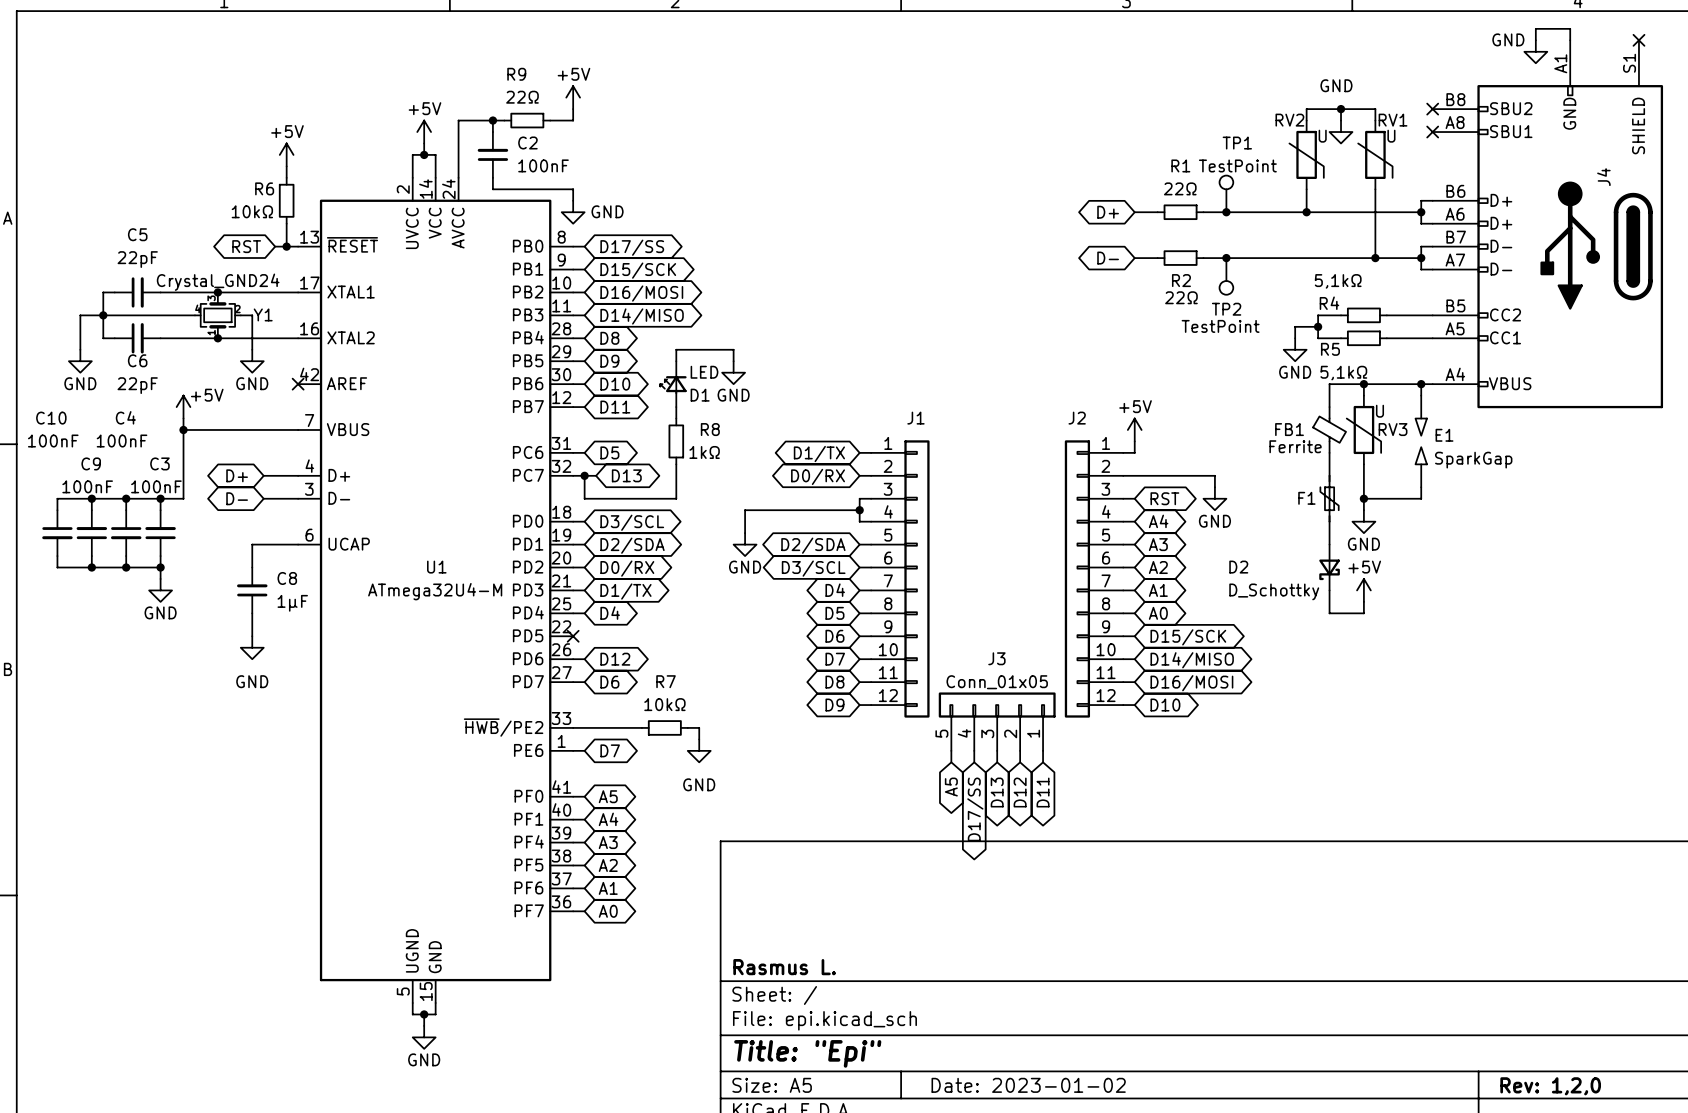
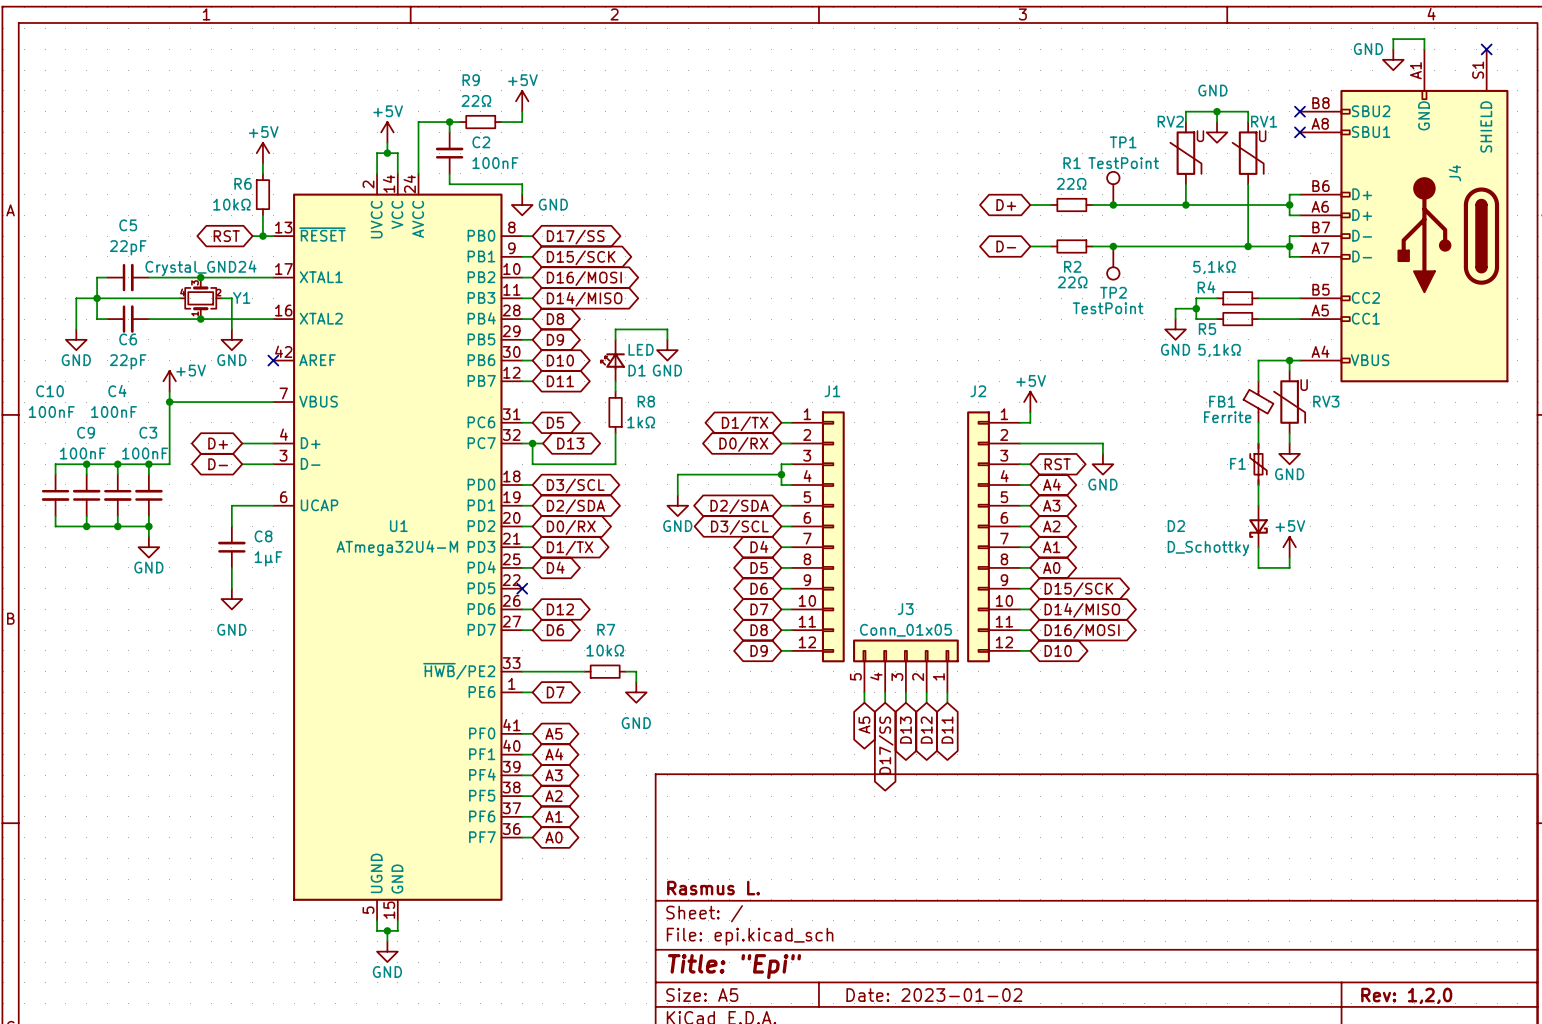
junction: (1363, 384) -> none
wire: (1386, 384) (1329, 384) (1329, 407) -> (1258, 360) (1258, 381)
FB1 position: (1329, 429) -> (1258, 402)
RV3 position: (1363, 429) -> (1289, 402)
RV3 name position: RV3 (1393, 429) -> RV3 (1326, 401)
E1: SparkGap (1421, 441) -> none
wire: (1329, 452) (1329, 475) -> (1258, 422) (1258, 443)
wire: (1363, 464) (1363, 510) -> none
wire: (1421, 487) (1421, 498) (1363, 498) -> none
F1 position: (1329, 498) -> (1258, 464)
junction: (1363, 498) -> none
wire: (1329, 521) (1329, 544) -> (1258, 484) (1258, 505)
power symbol position: GND (1363, 521) -> GND (1289, 453)
D2 position: (1329, 567) -> (1258, 526)
wire: (1329, 590) (1329, 613) (1363, 613) (1363, 601) -> (1258, 547) (1258, 567) (1289, 567) (1289, 557)
power symbol position: +5V (1363, 590) -> +5V (1289, 547)

